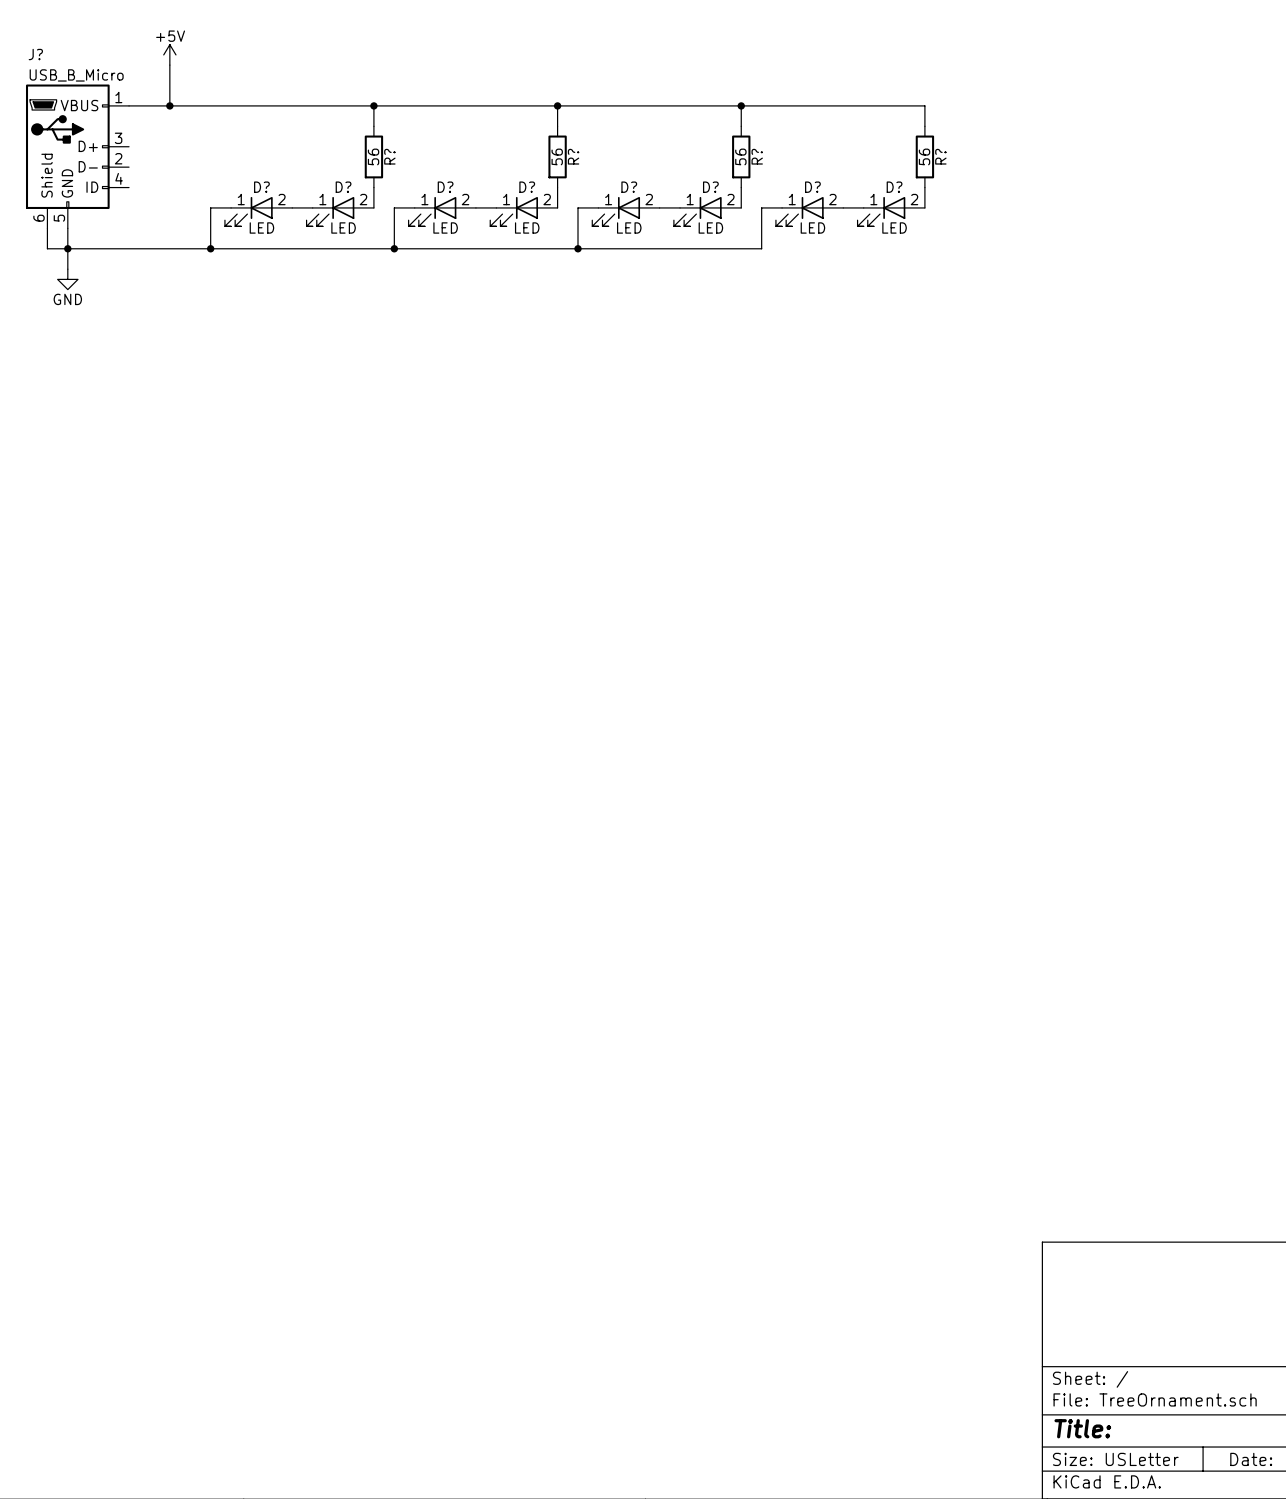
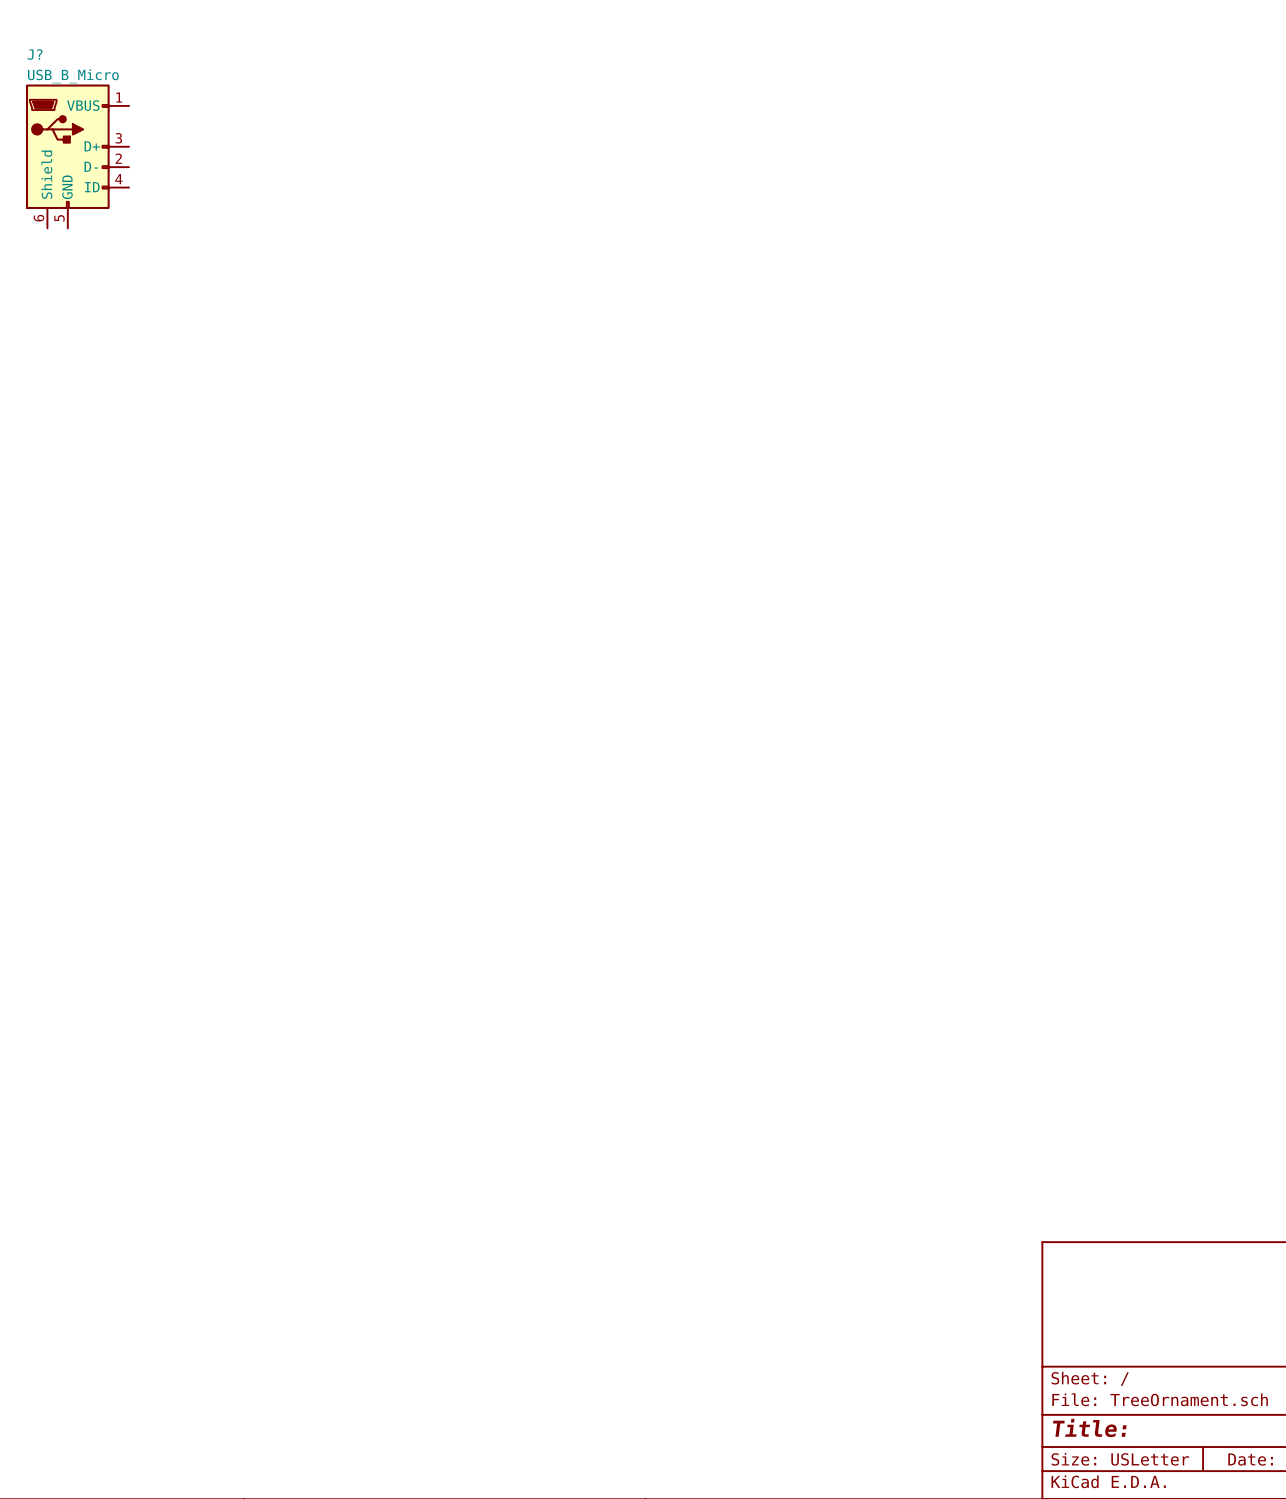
power symbol: +5V (169, 54) -> none
wire: (169, 65) (169, 105) -> none
wire: (129, 105) (924, 105) (924, 126) -> none
junction: (169, 105) -> none
wire: (373, 105) (373, 126) -> none
junction: (373, 105) -> none
wire: (557, 105) (557, 126) -> none
junction: (557, 105) -> none
wire: (741, 105) (741, 126) -> none
junction: (741, 105) -> none
R?: 56 (373, 156) -> none
R?: 56 (557, 156) -> none
R?: 56 (741, 156) -> none
R?: 56 (924, 156) -> none
wire: (373, 187) (373, 207) -> none
wire: (557, 187) (557, 207) -> none
wire: (741, 187) (741, 207) -> none
wire: (924, 187) (924, 207) -> none
wire: (231, 207) (210, 207) (210, 248) -> none
wire: (292, 207) (312, 207) -> none
wire: (414, 207) (394, 207) (394, 248) -> none
wire: (475, 207) (496, 207) -> none
wire: (598, 207) (578, 207) (578, 248) -> none
wire: (659, 207) (680, 207) -> none
wire: (782, 207) (761, 207) (761, 248) (47, 248) (47, 228) -> none
wire: (843, 207) (863, 207) -> none
D?: LED (258, 211) -> none
D?: LED (340, 211) -> none
D?: LED (442, 211) -> none
D?: LED (523, 211) -> none
D?: LED (625, 211) -> none
D?: LED (707, 211) -> none
D?: LED (809, 211) -> none
D?: LED (891, 211) -> none
wire: (67, 228) (67, 269) -> none
junction: (67, 248) -> none
junction: (210, 248) -> none
junction: (394, 248) -> none
junction: (578, 248) -> none
power symbol: GND (67, 279) -> none

